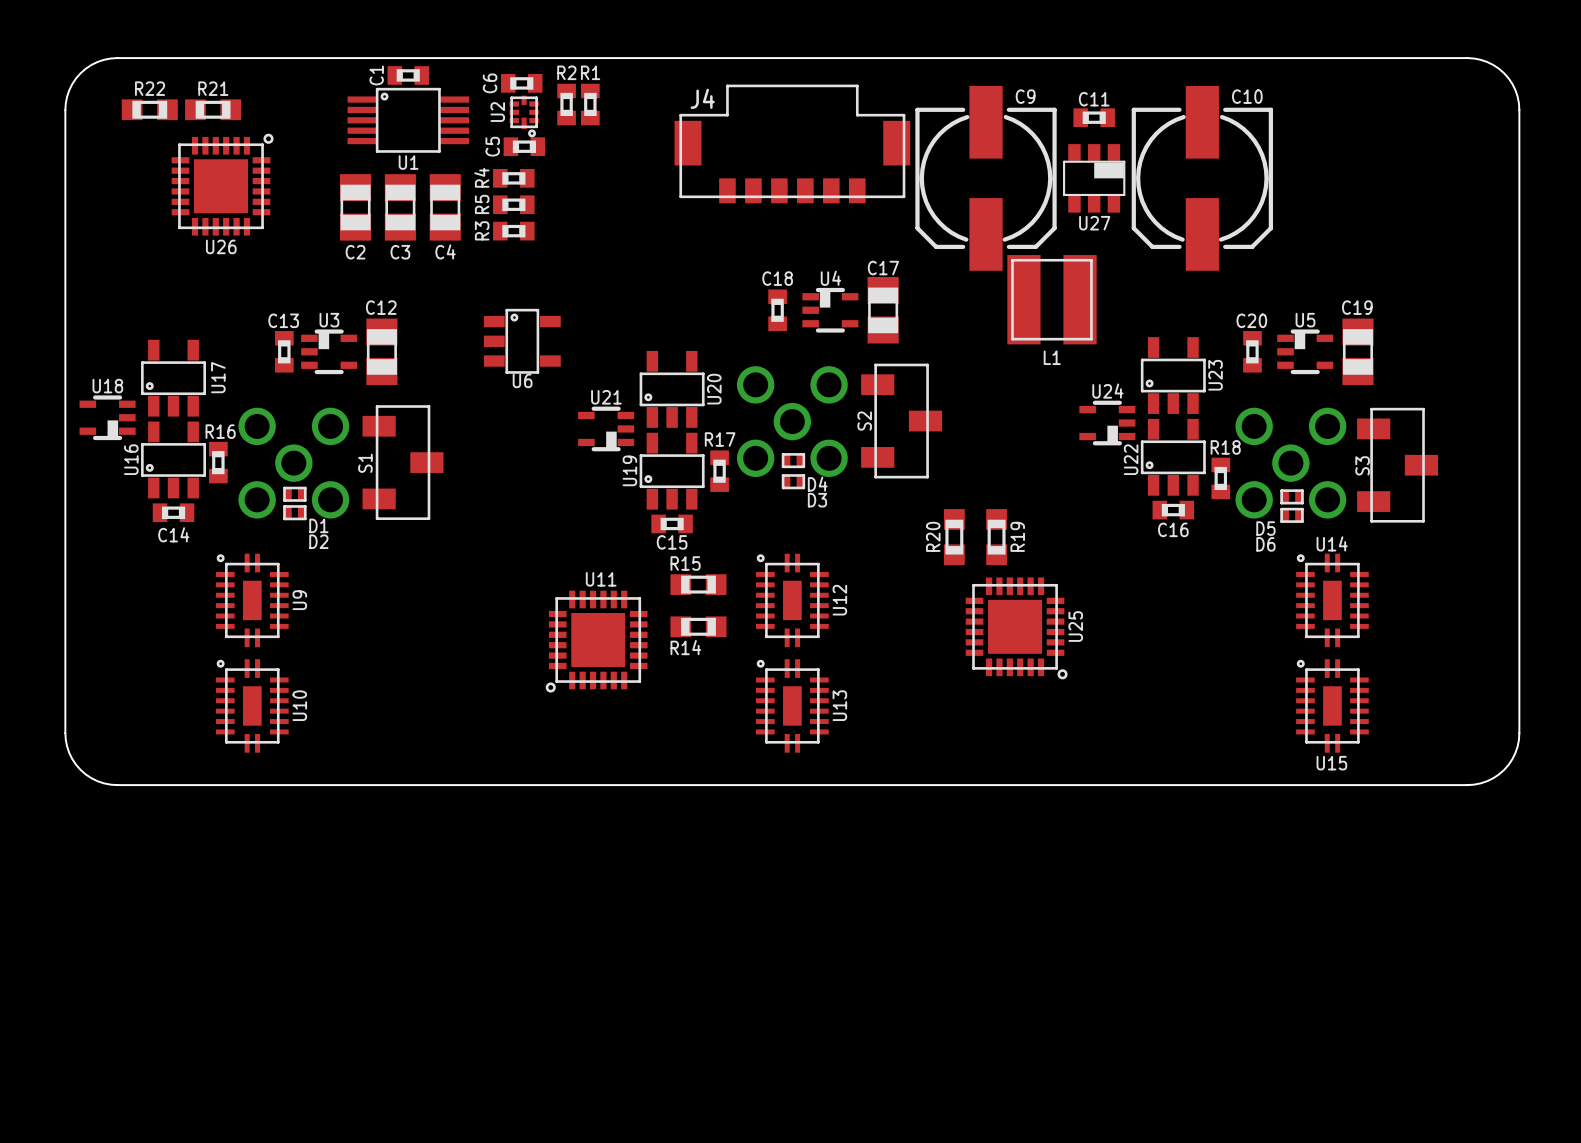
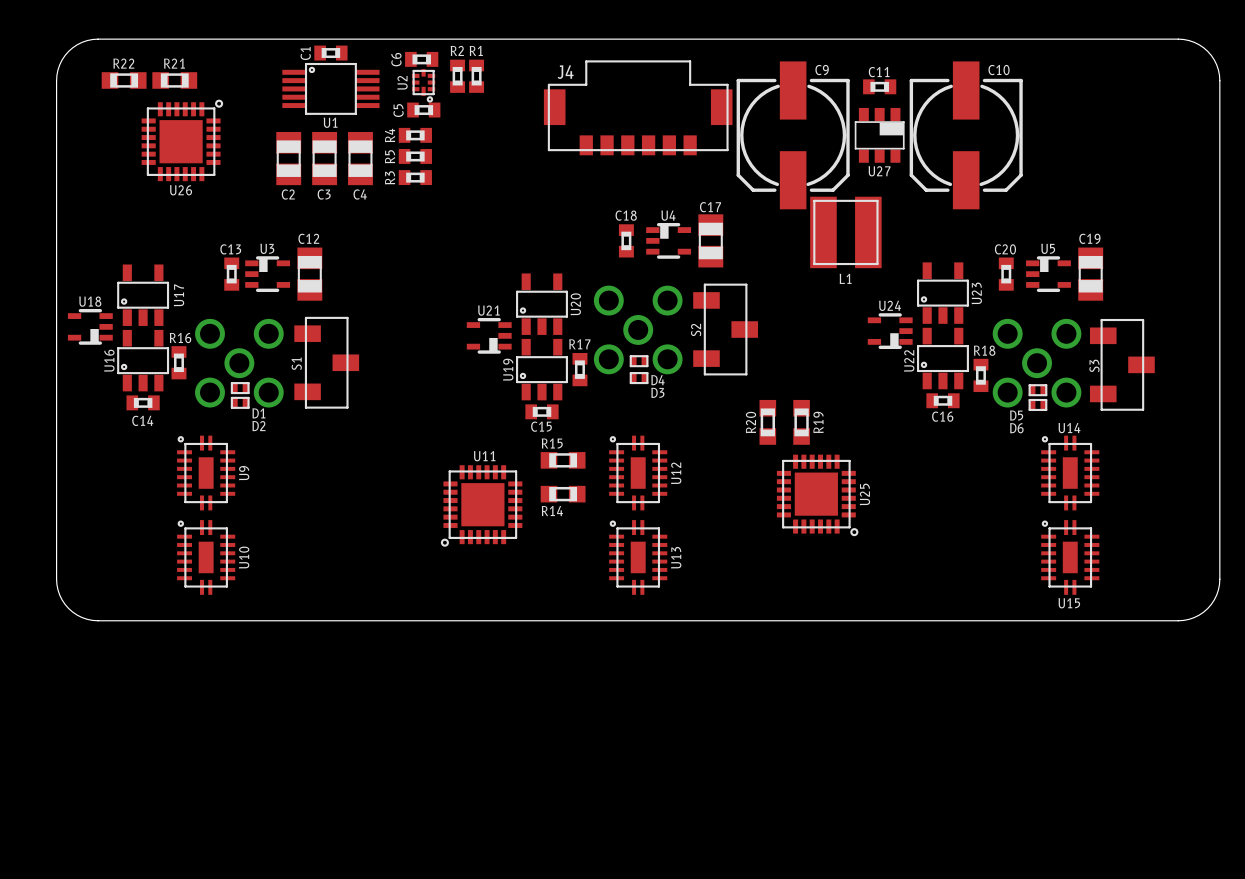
U6: (522, 341) -> none

